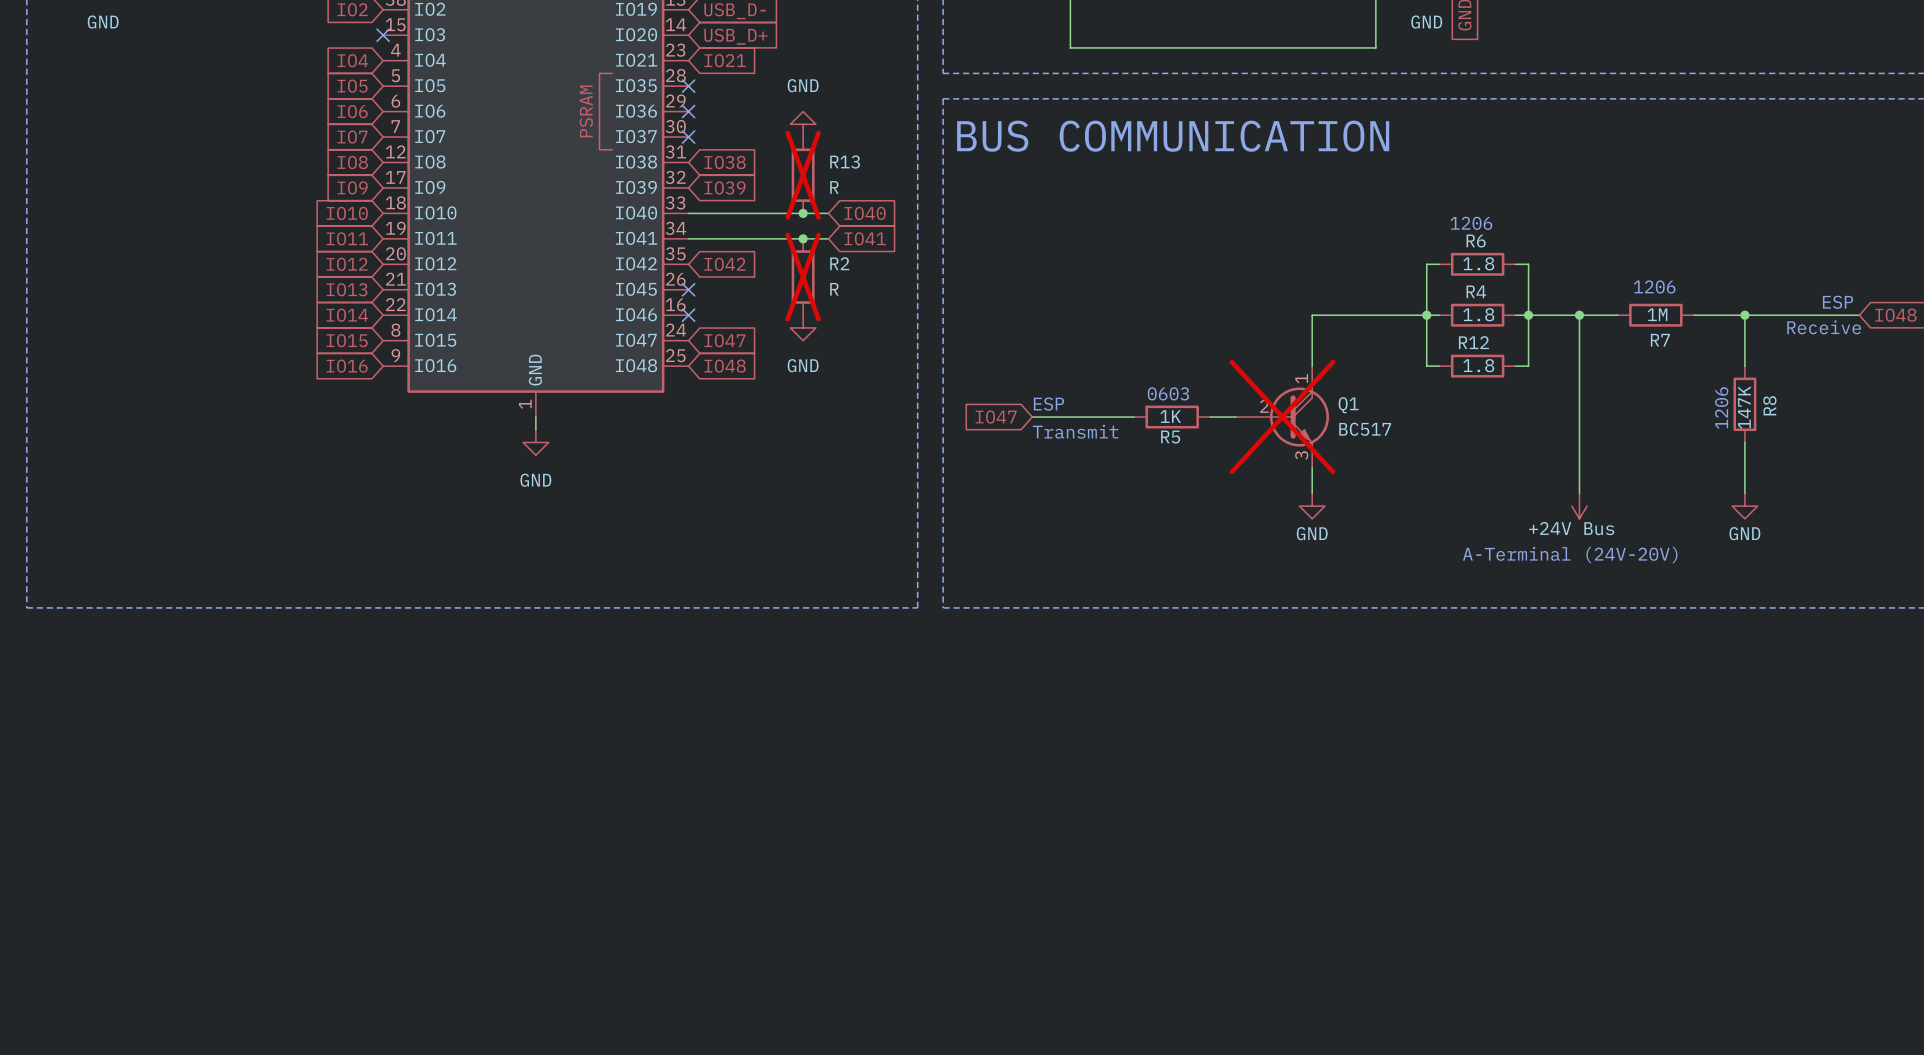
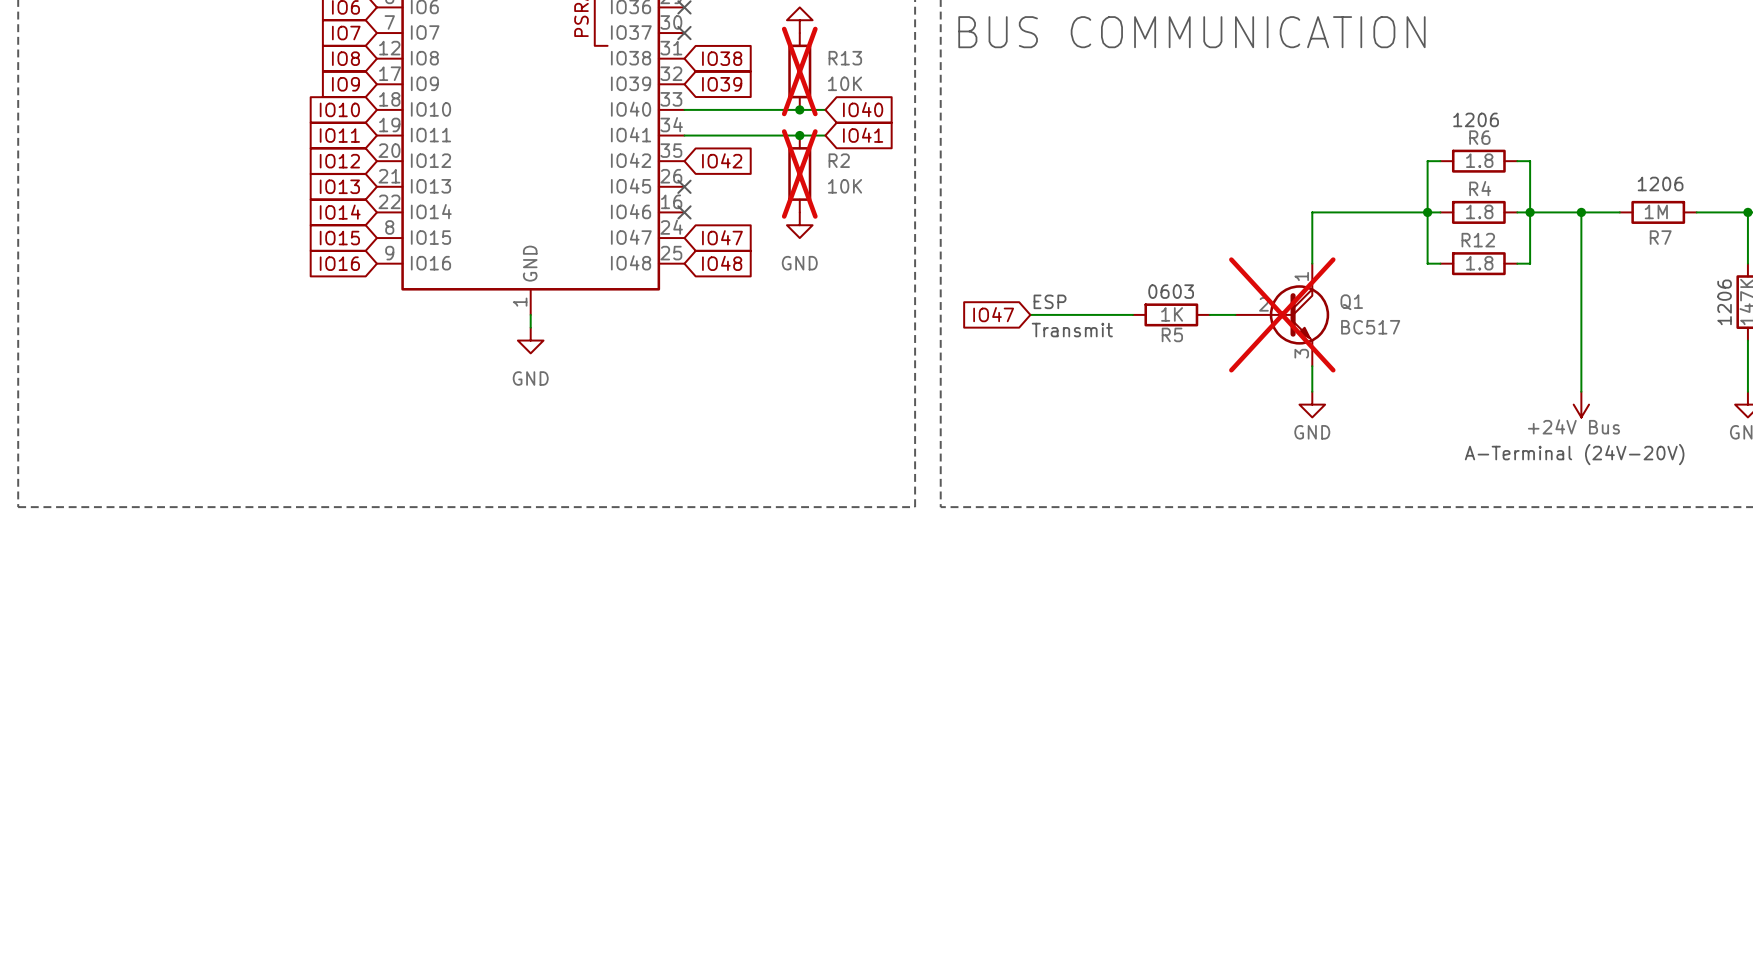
R13 value: R (834, 187) -> 10K (845, 83)
R2 value: R (834, 289) -> 10K (845, 186)

